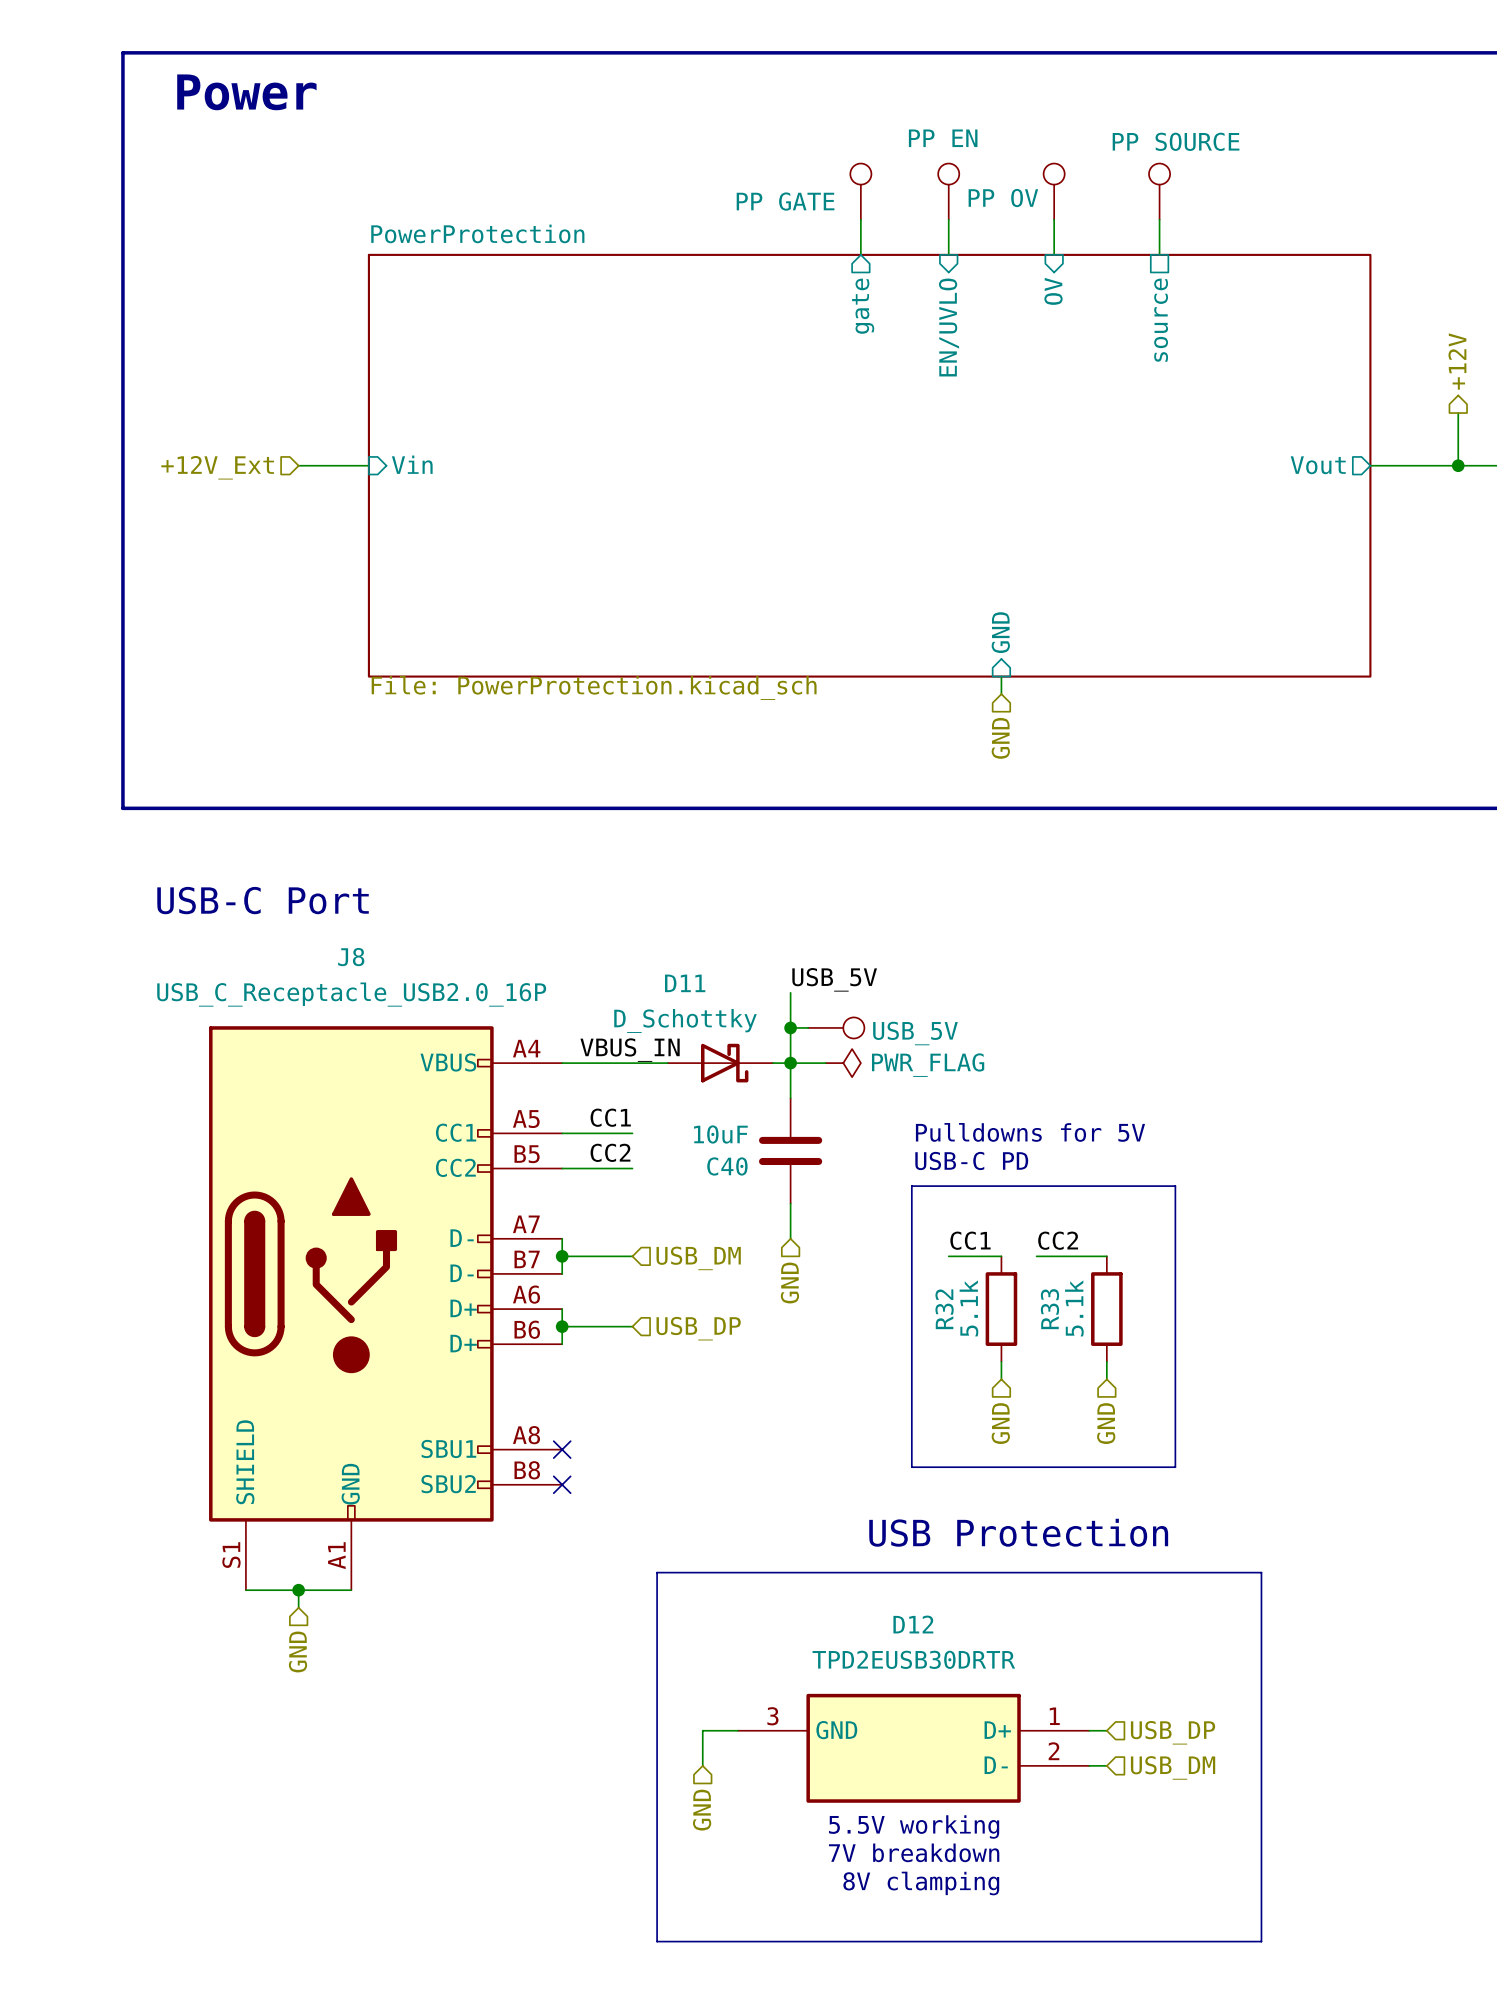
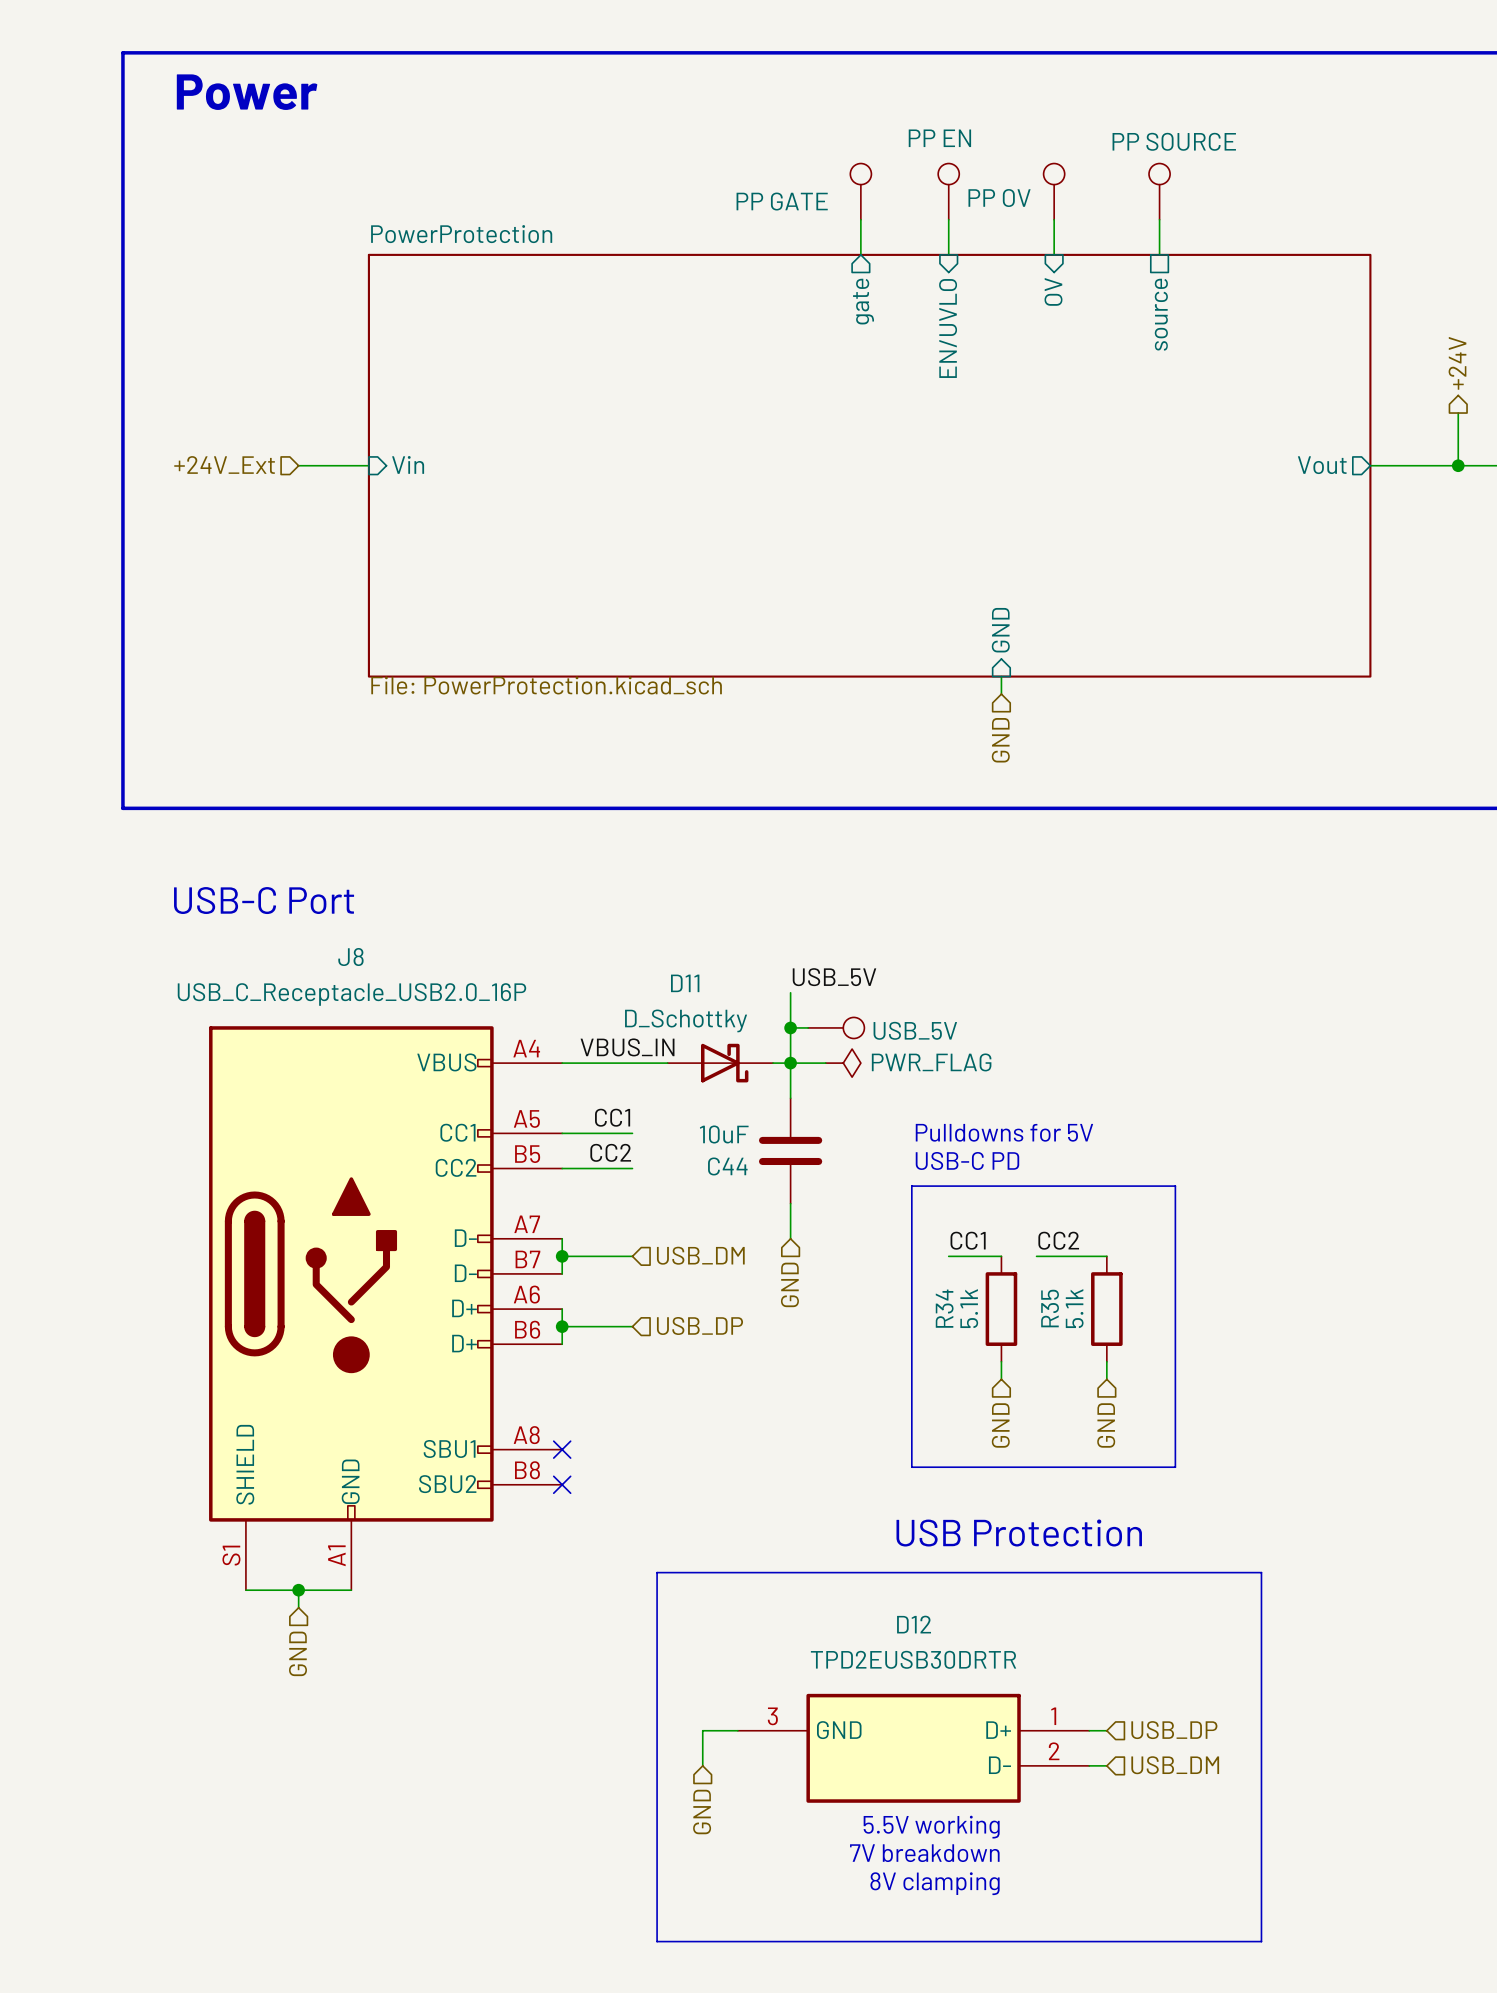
hierarchical label: +12V (1457, 361) -> +24V (1457, 363)
hierarchical label: +12V_Ext (217, 467) -> +24V_Ext (224, 464)
C40 name: C40 (727, 1166) -> C44 (727, 1166)
R32 name: R32 (944, 1309) -> R34 (944, 1308)
R33 name: R33 (1049, 1309) -> R35 (1050, 1308)

